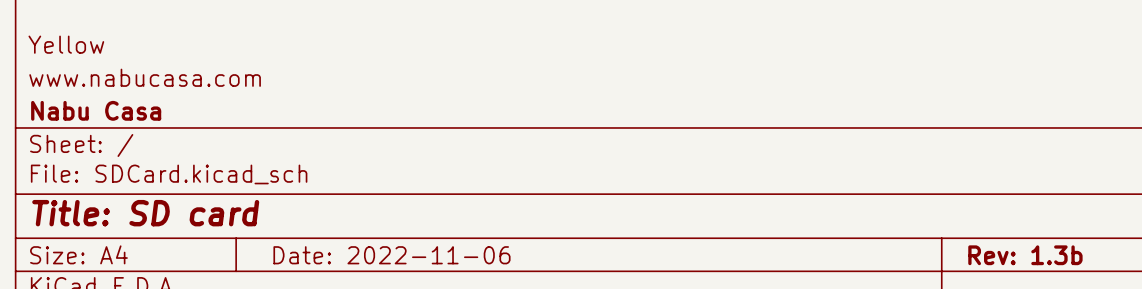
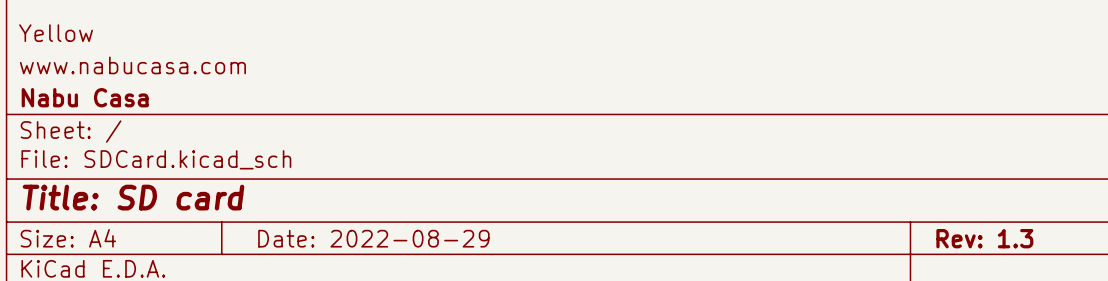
title block: Date: 2022-11-06 (391, 255) -> Date: 2022-08-29 (373, 238)
title block: Rev: 1.3b (1025, 255) -> Rev: 1.3 (984, 238)

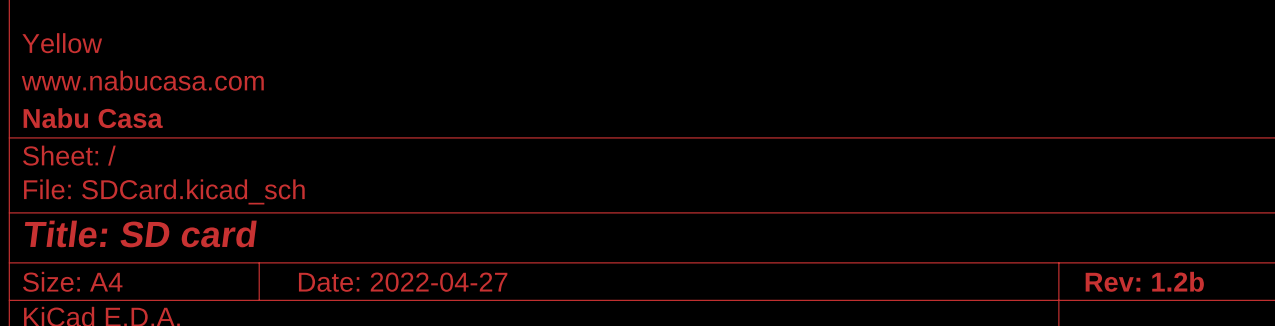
title block: Date: 2022-08-29 (373, 238) -> Date: 2022-04-27 (403, 282)
title block: Rev: 1.3 (984, 238) -> Rev: 1.2b (1144, 281)

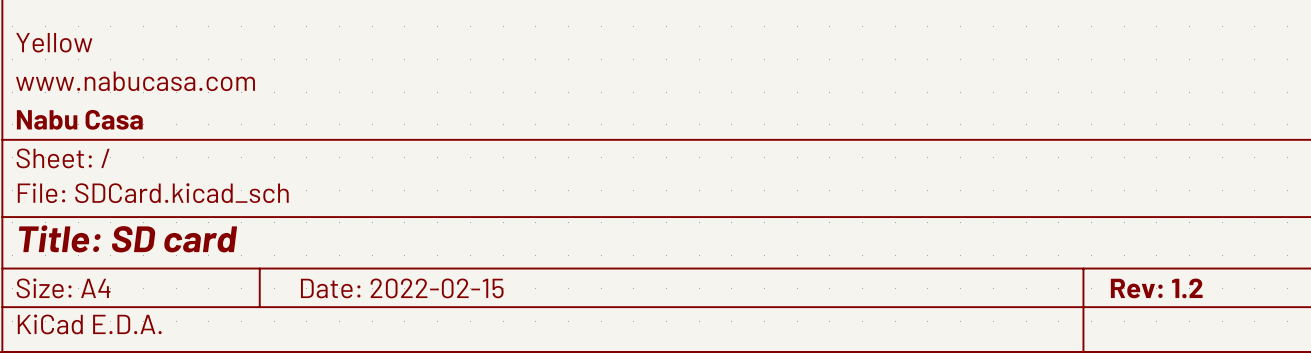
title block: Rev: 1.2b (1144, 281) -> Rev: 1.2 (1156, 288)
title block: Date: 2022-04-27 (403, 282) -> Date: 2022-02-15 (402, 288)

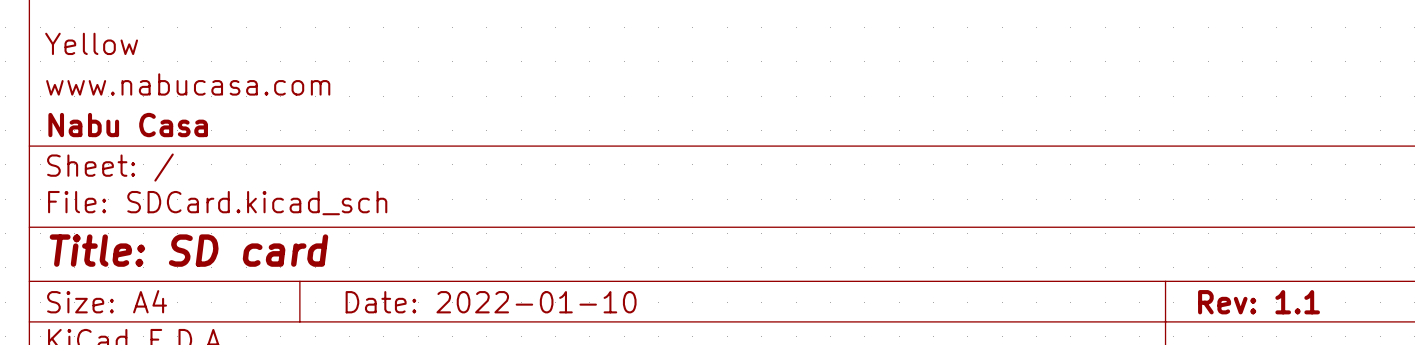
title block: Date: 2022-02-15 (402, 288) -> Date: 2022-01-10 (491, 302)
title block: Rev: 1.2 (1156, 288) -> Rev: 1.1 (1259, 302)

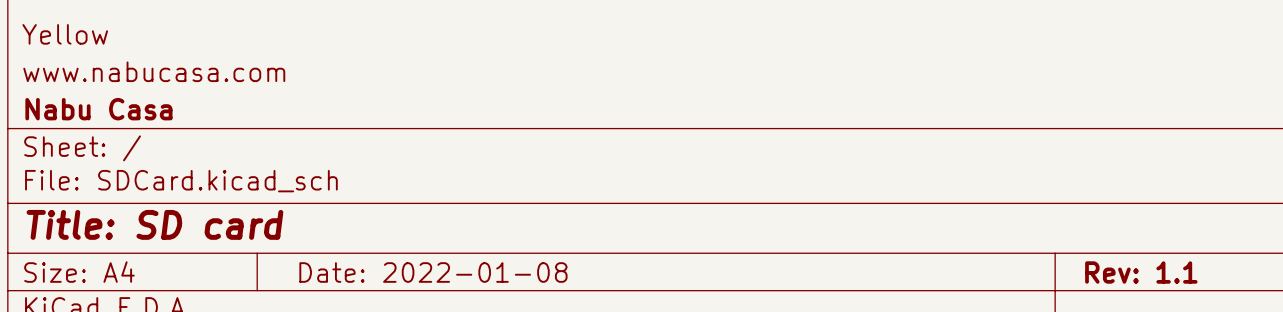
title block: Date: 2022-01-10 (491, 302) -> Date: 2022-01-08 (433, 272)

